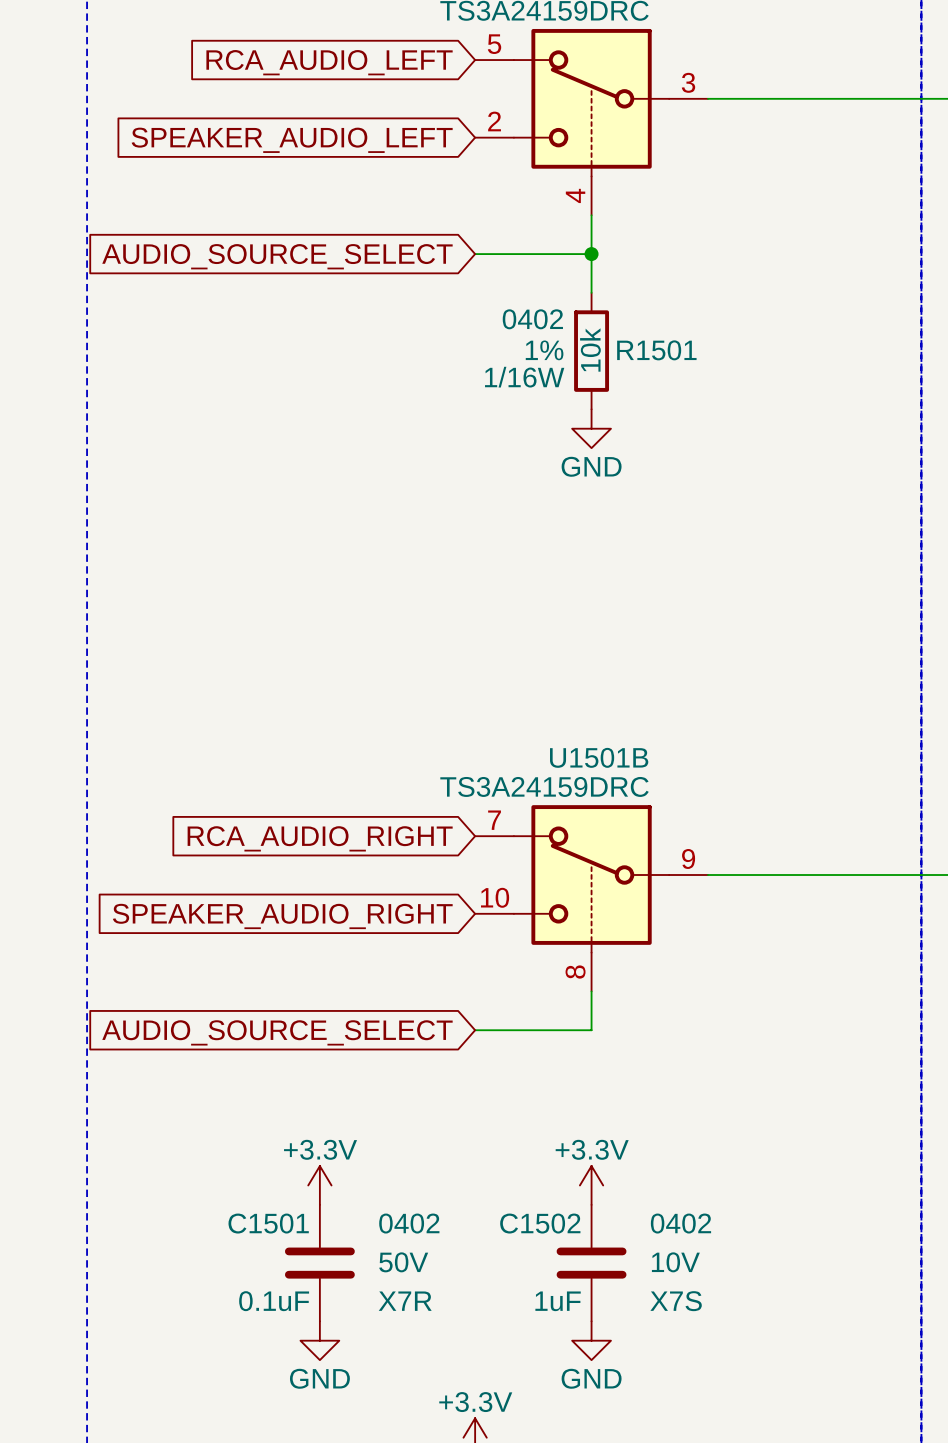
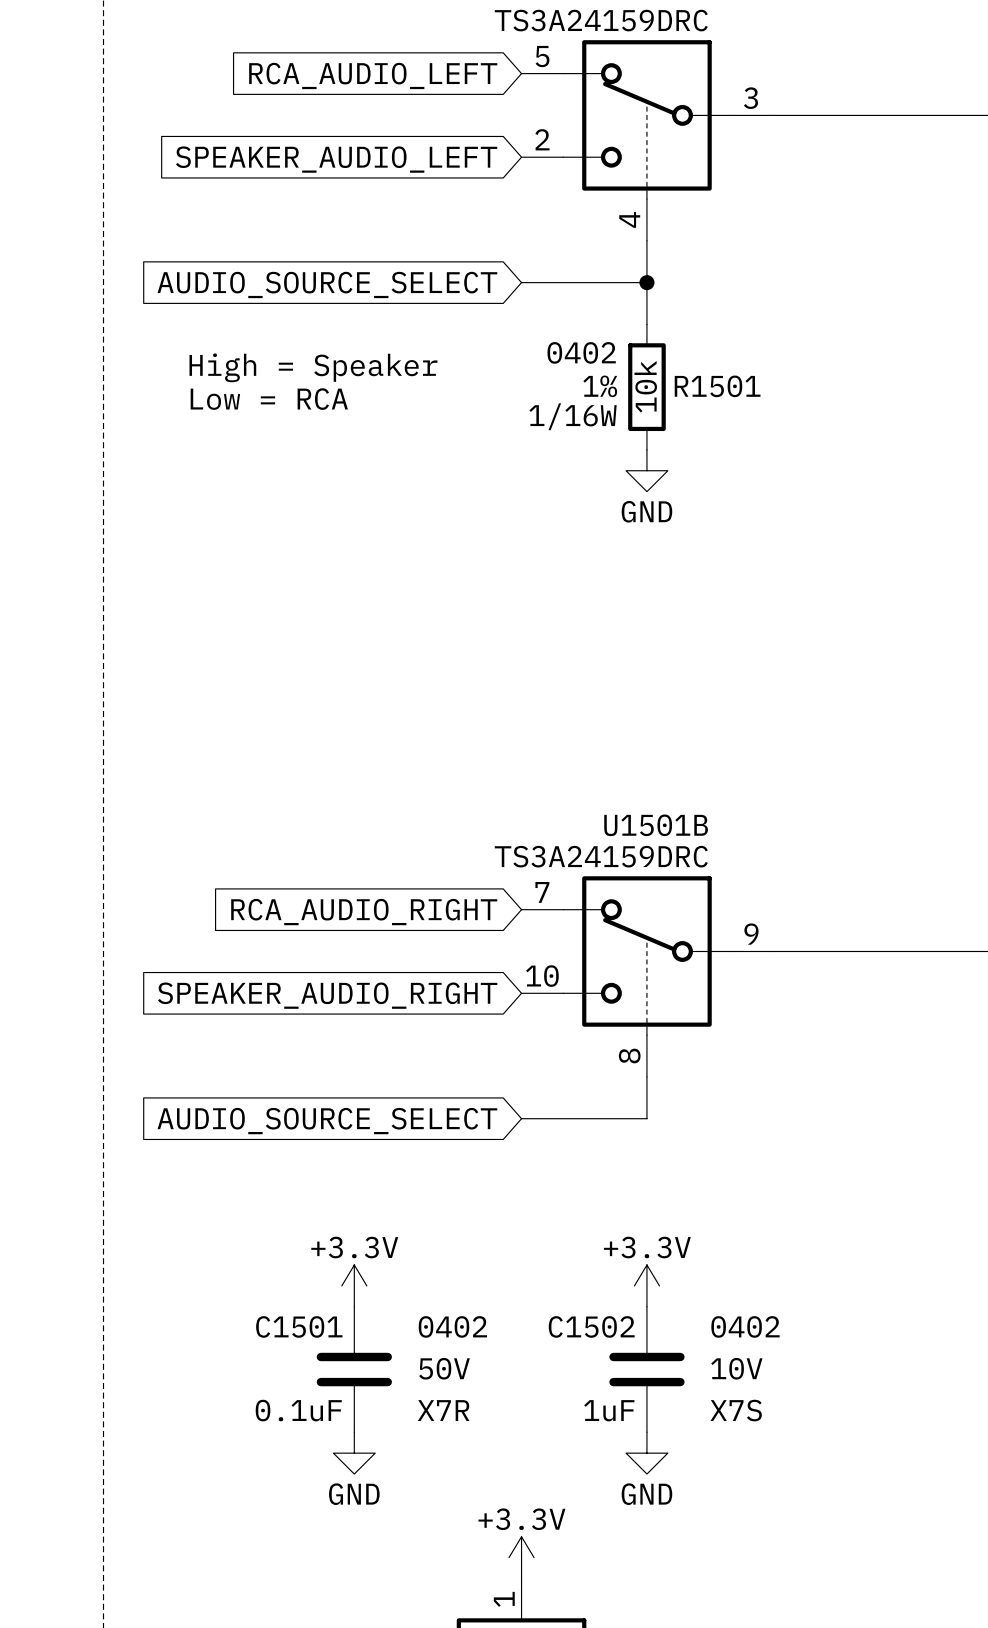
text: none -> High = Speaker (313, 367)
text: none -> Low = RCA (269, 399)

